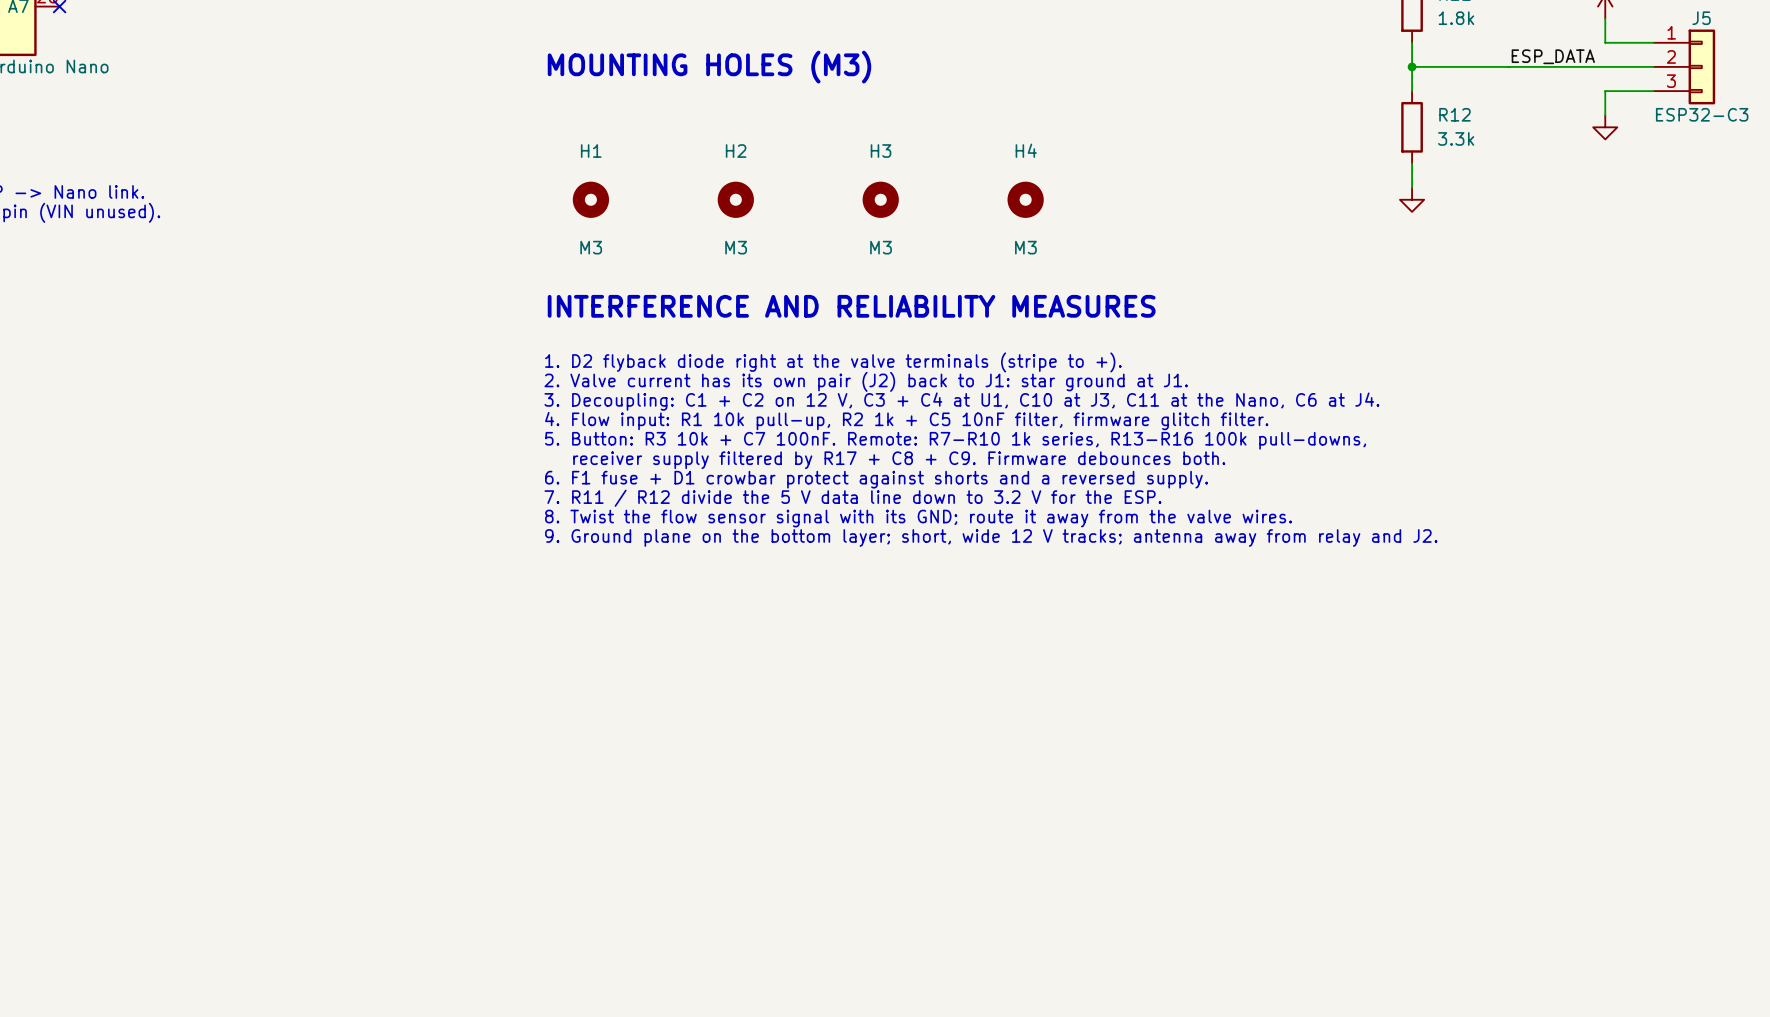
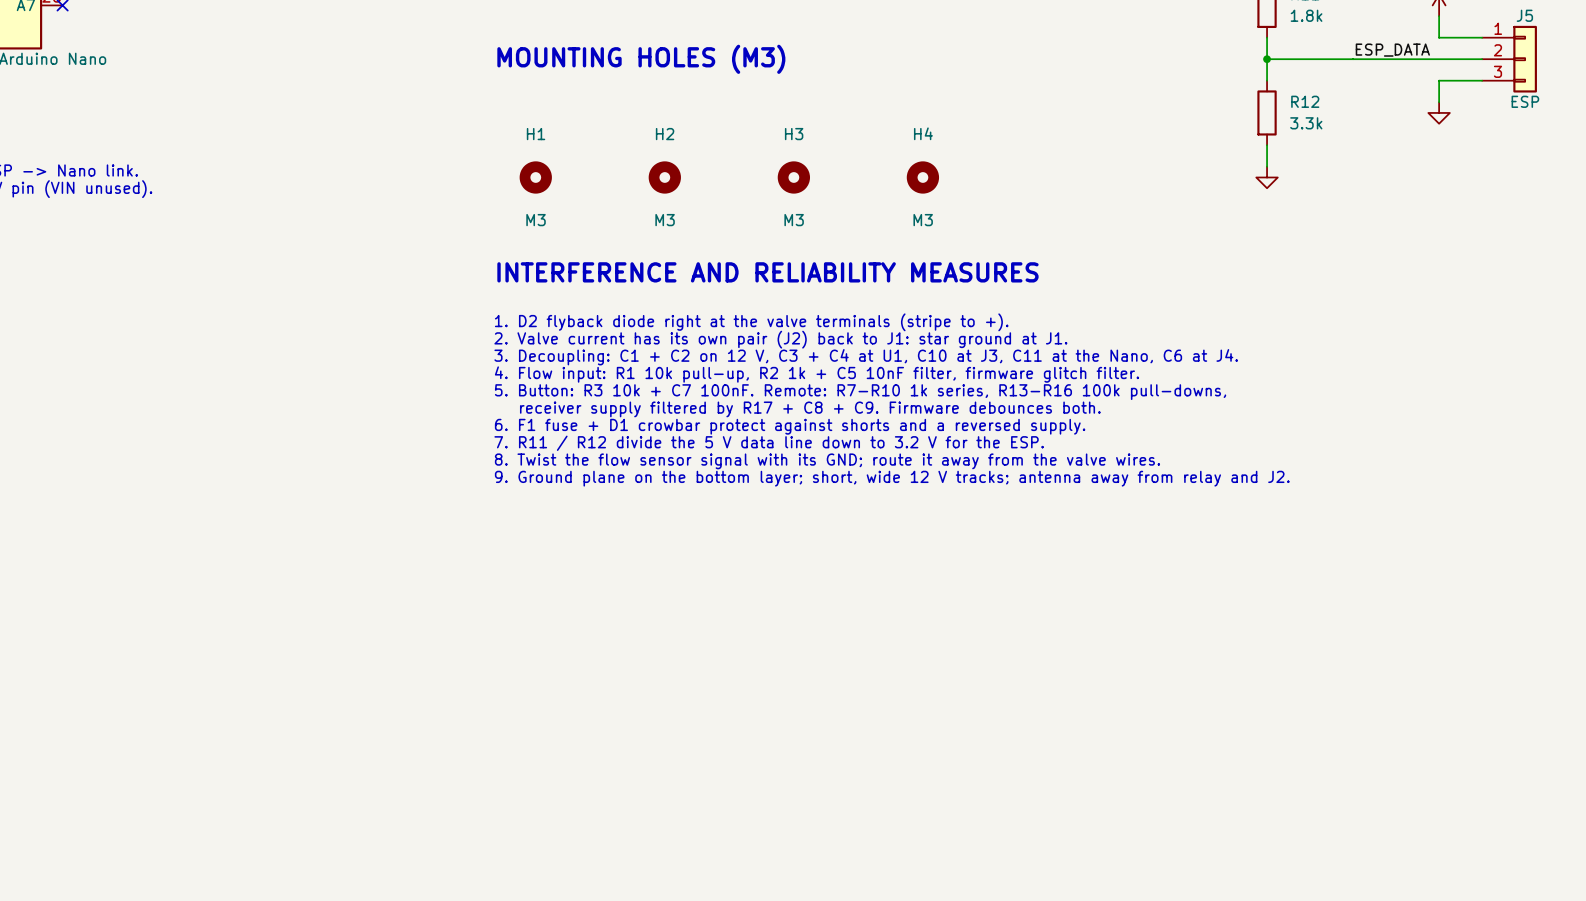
J5 value: ESP32-C3 (1702, 114) -> ESP (1525, 101)

